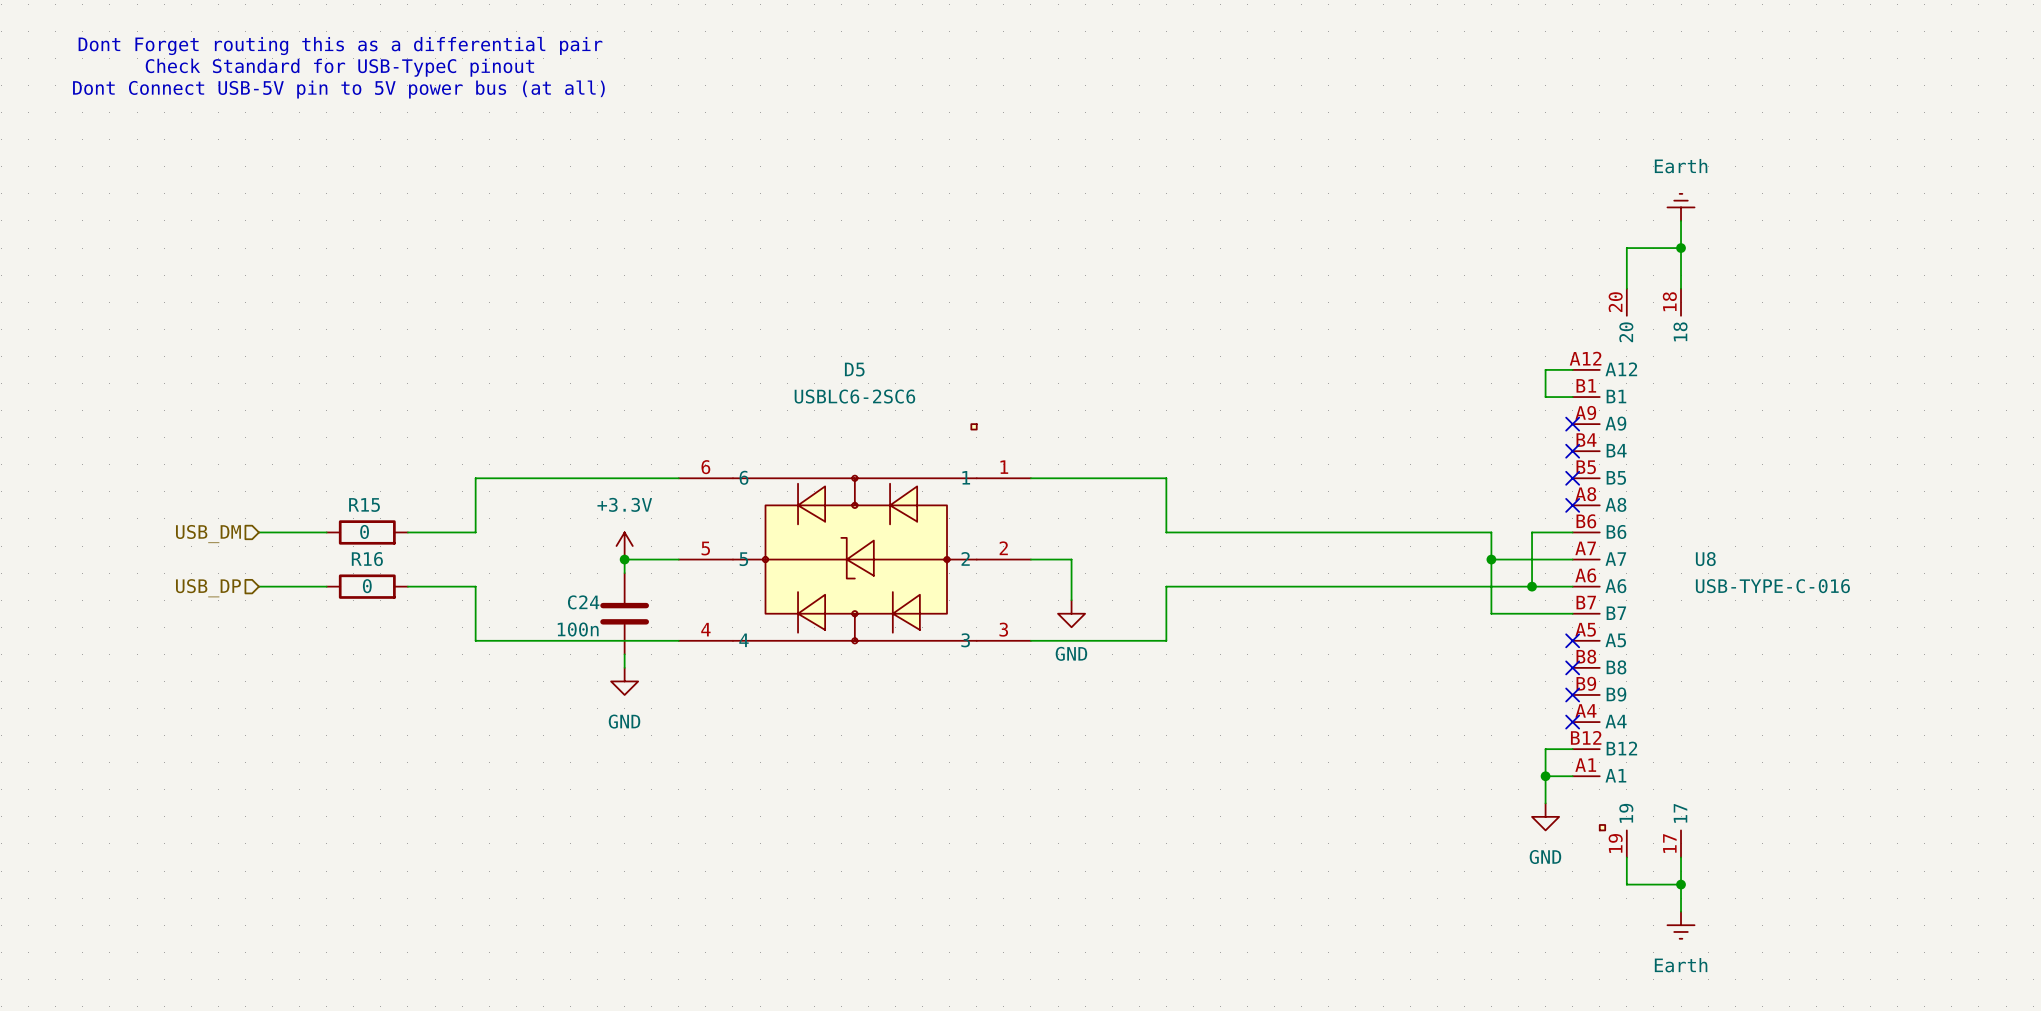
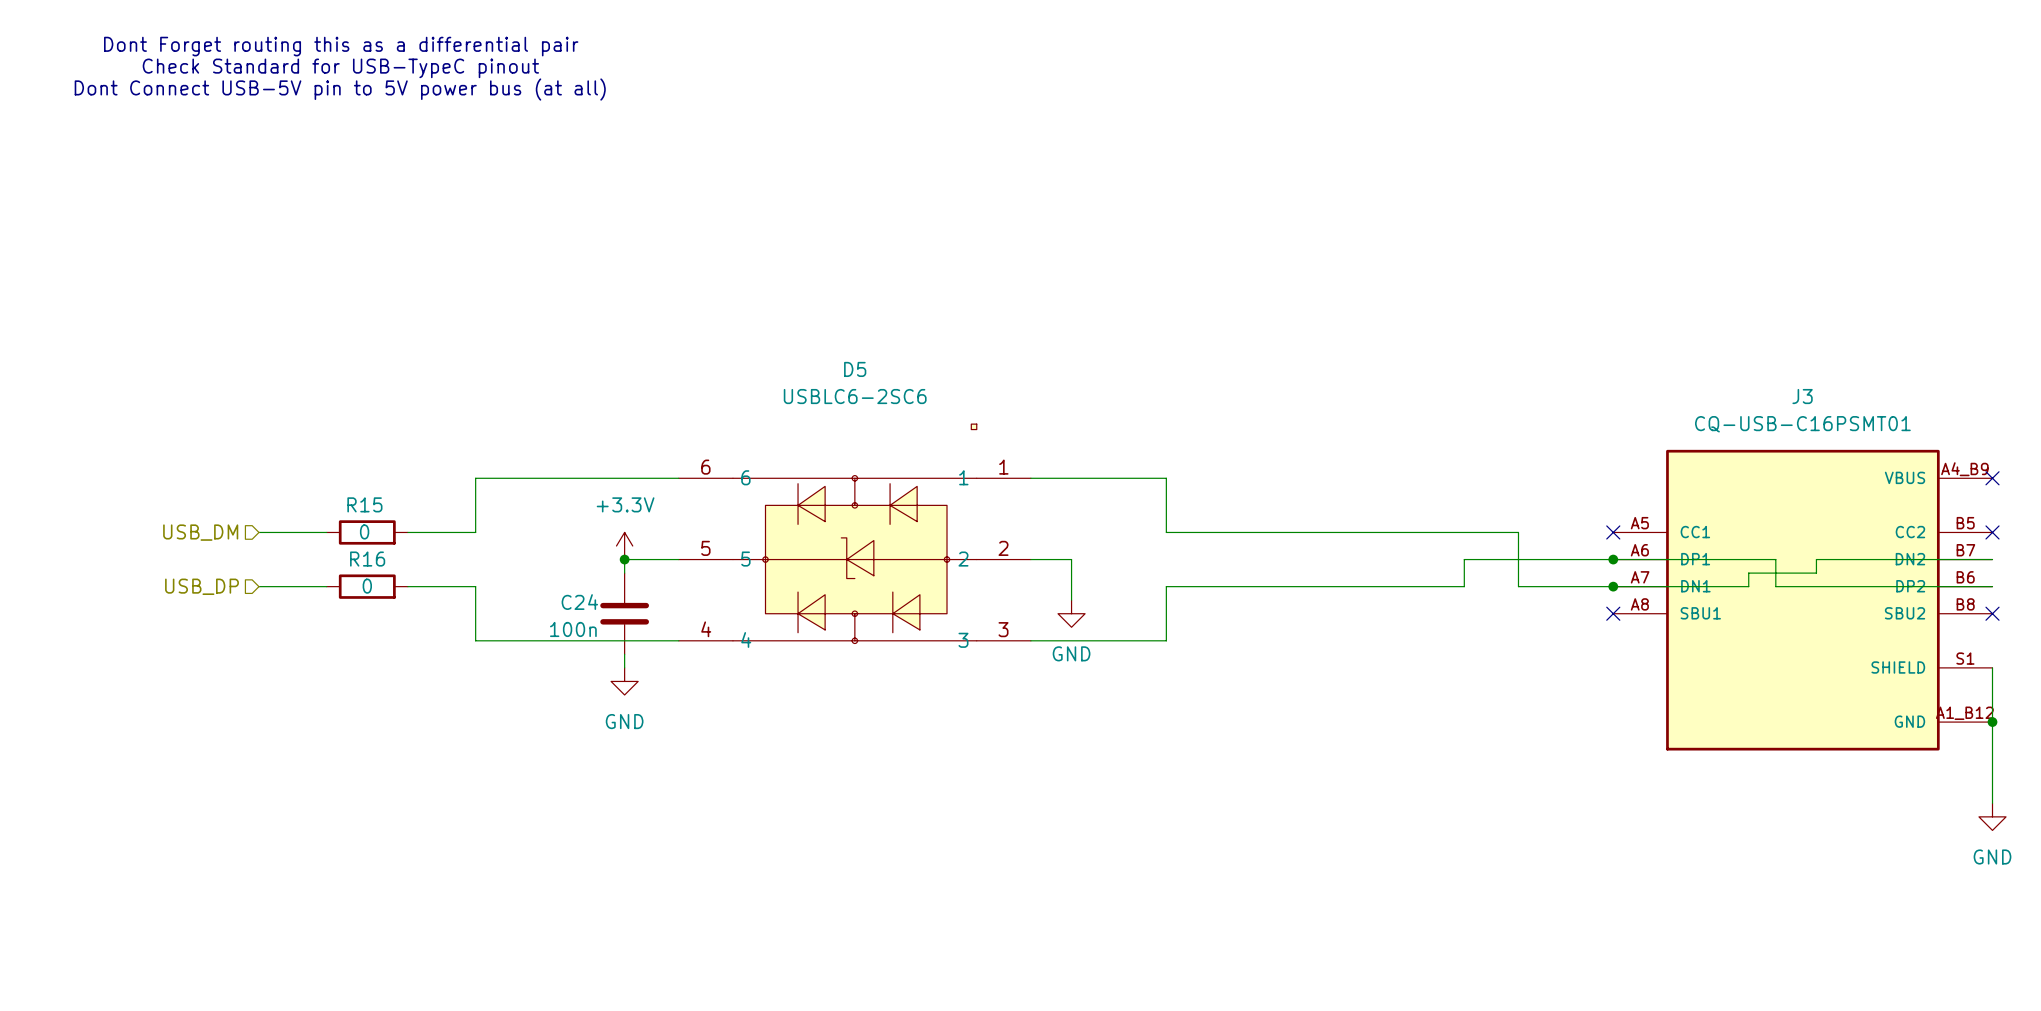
power symbol: Earth (1681, 207) -> none
wire: (1681, 220) (1681, 288) -> none
wire: (1681, 248) (1626, 248) (1626, 288) -> none
junction: (1681, 248) -> none
wire: (1572, 369) (1545, 369) (1545, 397) (1572, 397) -> none
no-connect mark: (1572, 424) -> none
no-connect mark: (1572, 451) -> none
no-connect mark: (1572, 478) -> none
no-connect mark: none -> (1992, 478)
no-connect mark: (1572, 505) -> none
wire: (1491, 532) (1491, 613) (1572, 613) -> (1491, 532) (1518, 532) (1518, 586)
wire: (1572, 532) (1532, 532) (1532, 586) -> none
no-connect mark: none -> (1613, 532)
no-connect mark: none -> (1992, 532)
junction: (1491, 559) -> none
wire: none -> (1572, 559) (1775, 559) (1775, 586) (1992, 586)
junction: none -> (1613, 559)
wire: none -> (1992, 559) (1816, 559) (1816, 573) (1748, 573) (1748, 586) (1572, 586)
U8: USB-TYPE-C-016 (1626, 573) -> none
wire: (1464, 586) (1518, 586) -> (1464, 586) (1464, 559) (1491, 559)
junction: (1532, 586) -> none
junction: none -> (1613, 586)
J3: none -> CQ-USB-C16PSMT01 (1802, 600)
no-connect mark: none -> (1613, 613)
no-connect mark: none -> (1992, 613)
no-connect mark: (1572, 640) -> none
no-connect mark: (1572, 667) -> none
wire: none -> (1992, 667) (1992, 803)
no-connect mark: (1572, 694) -> none
no-connect mark: (1572, 722) -> none
junction: none -> (1992, 722)
wire: (1572, 749) (1545, 749) (1545, 803) -> none
wire: (1545, 776) (1572, 776) -> none
junction: (1545, 776) -> none
power symbol: GND (1545, 816) -> none
power symbol: none -> GND (1992, 816)
wire: (1626, 857) (1626, 884) (1681, 884) -> none
wire: (1681, 857) (1681, 911) -> none
junction: (1681, 884) -> none
power symbol: Earth (1681, 925) -> none

